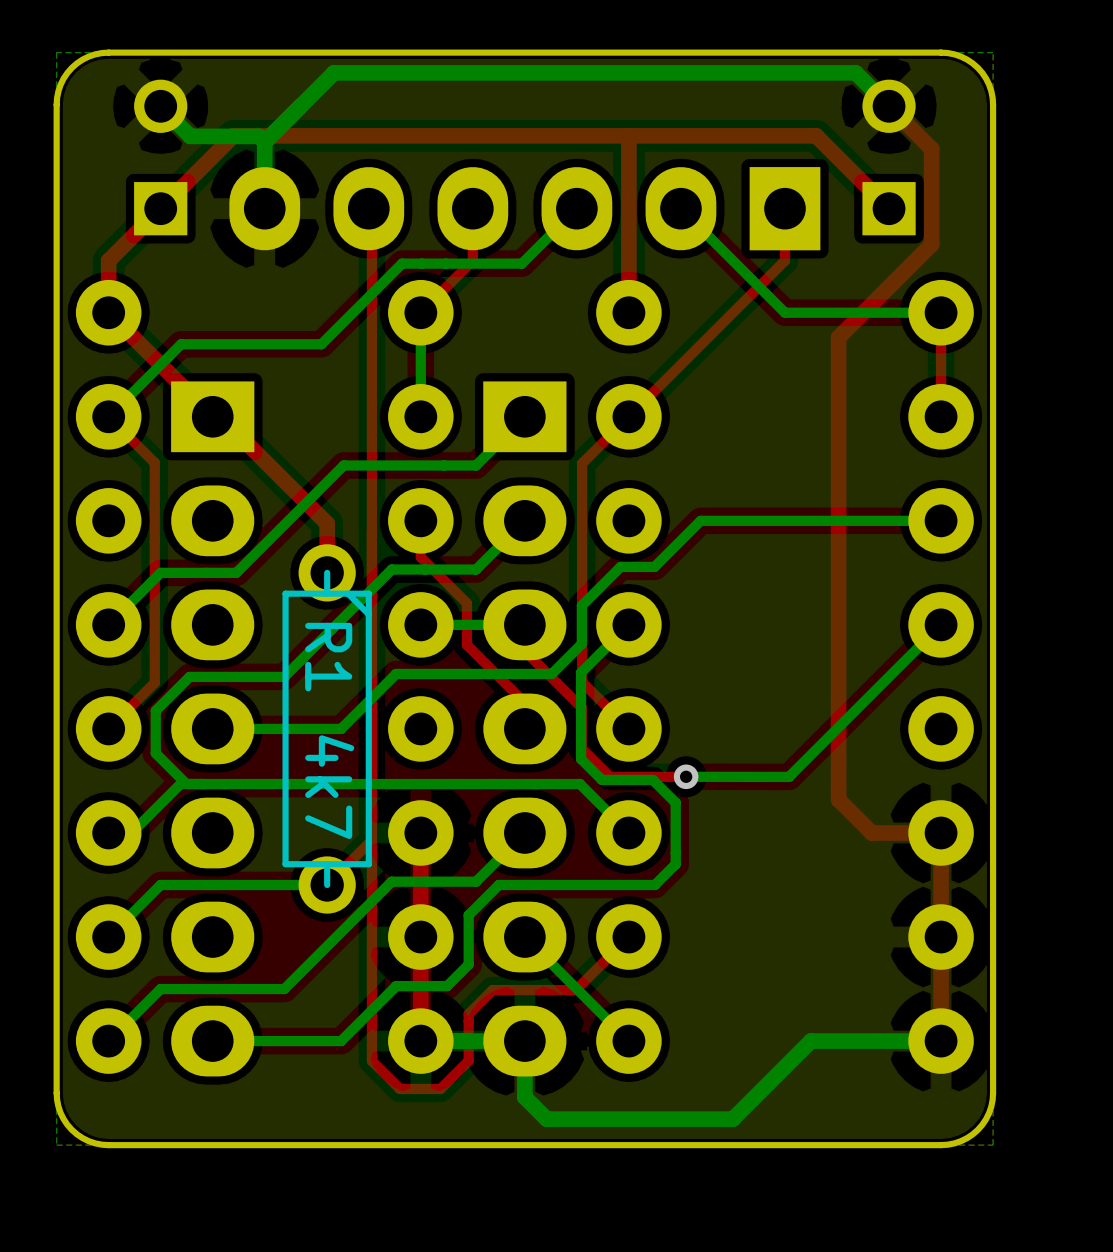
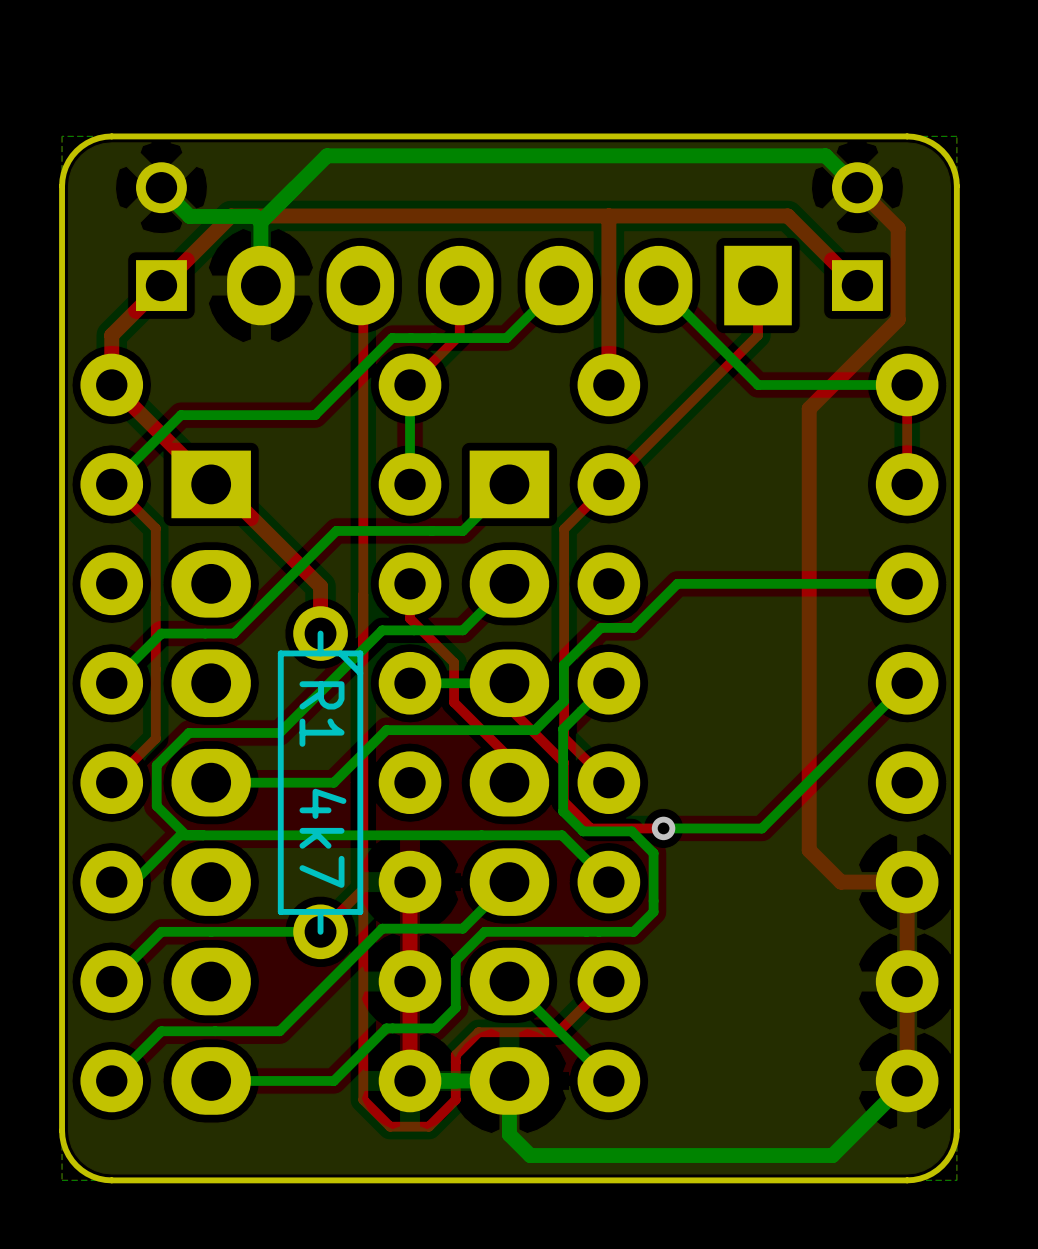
bottom track: (941, 1041) (811, 1041) (732, 1119) -> (907, 1080) (832, 1155) (708, 1155)

